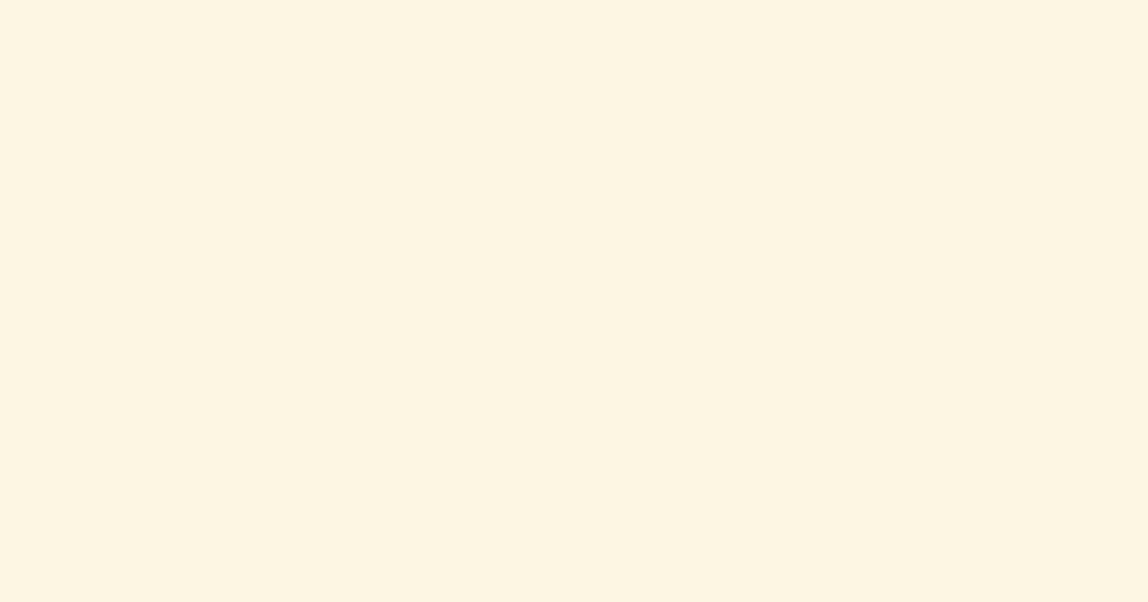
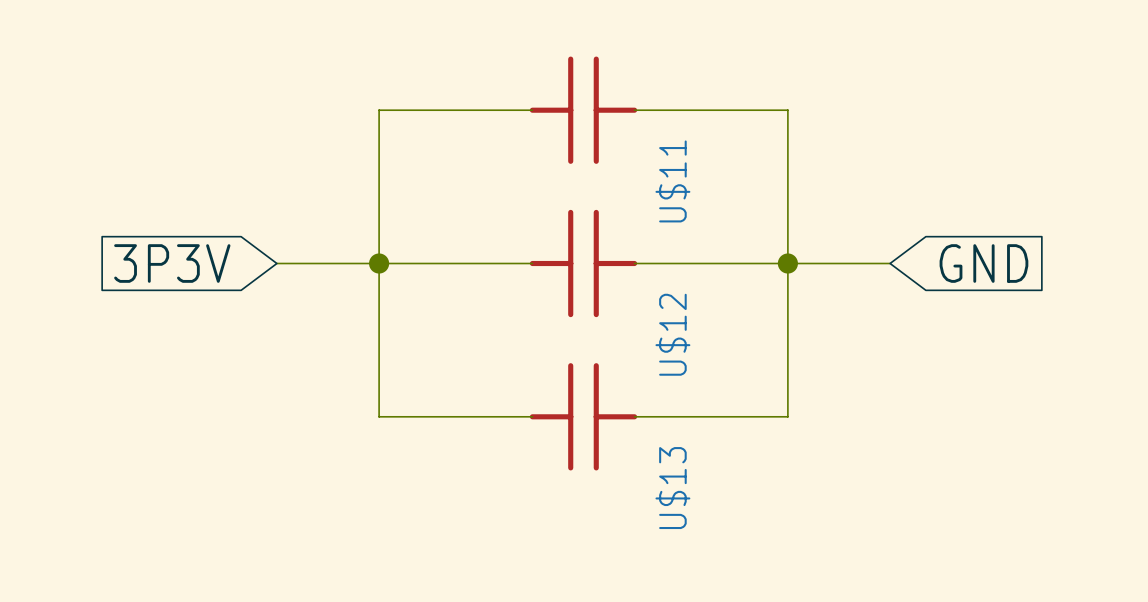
wire: none -> (532, 110) (379, 110) (379, 416) (532, 416)
U$11: none -> (583, 110)
wire: none -> (634, 110) (787, 110) (787, 416) (634, 416)
global label: none -> 3P3V (172, 263)
wire: none -> (276, 263) (532, 263)
junction: none -> (379, 263)
U$12: none -> (583, 263)
wire: none -> (634, 263) (890, 263)
junction: none -> (787, 263)
global label: none -> GND (983, 263)
U$13: none -> (583, 416)

